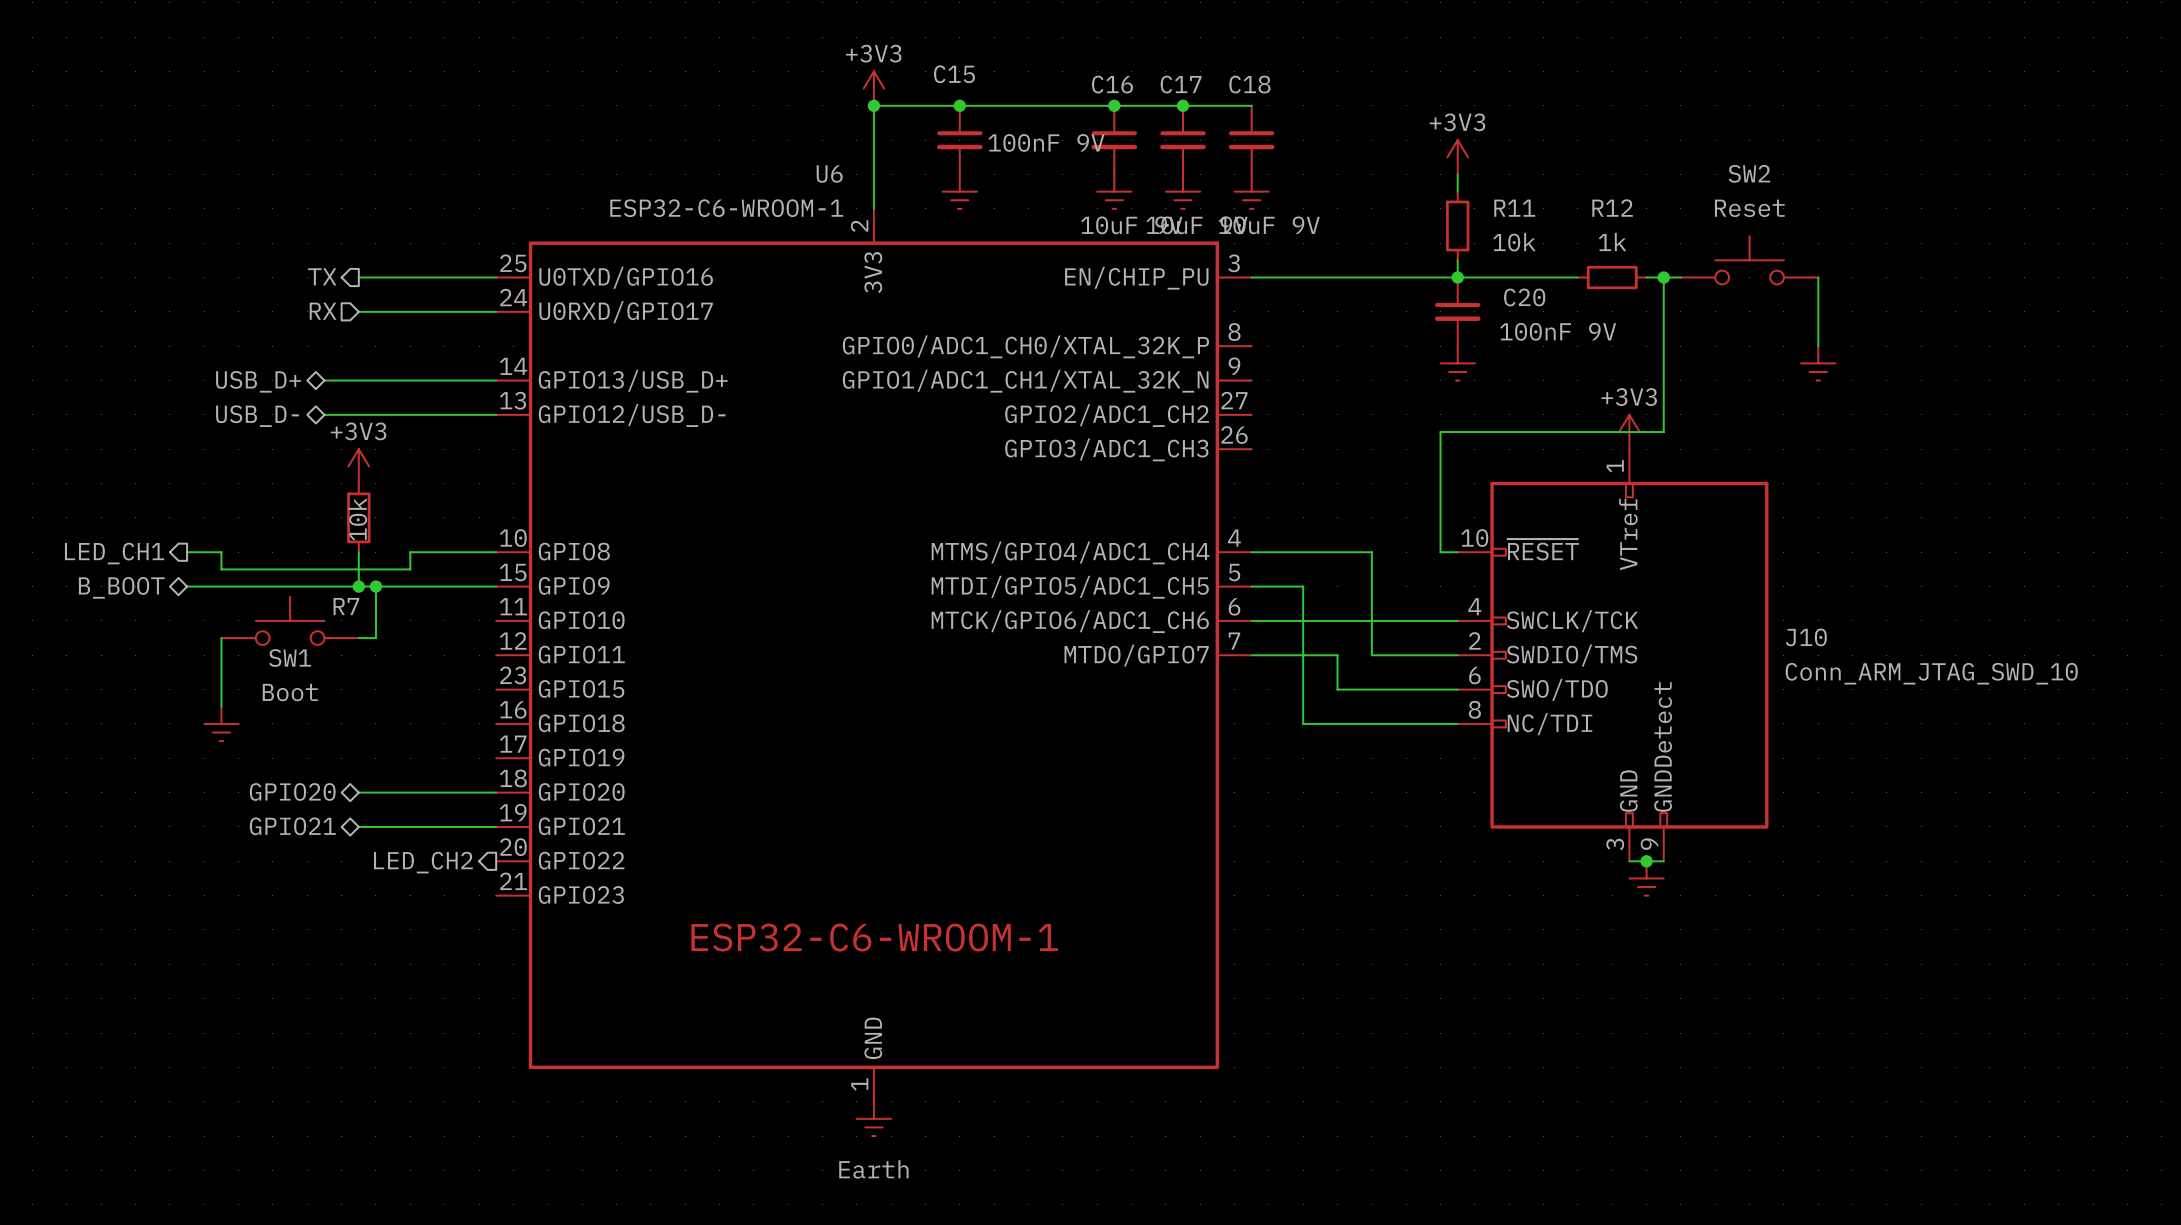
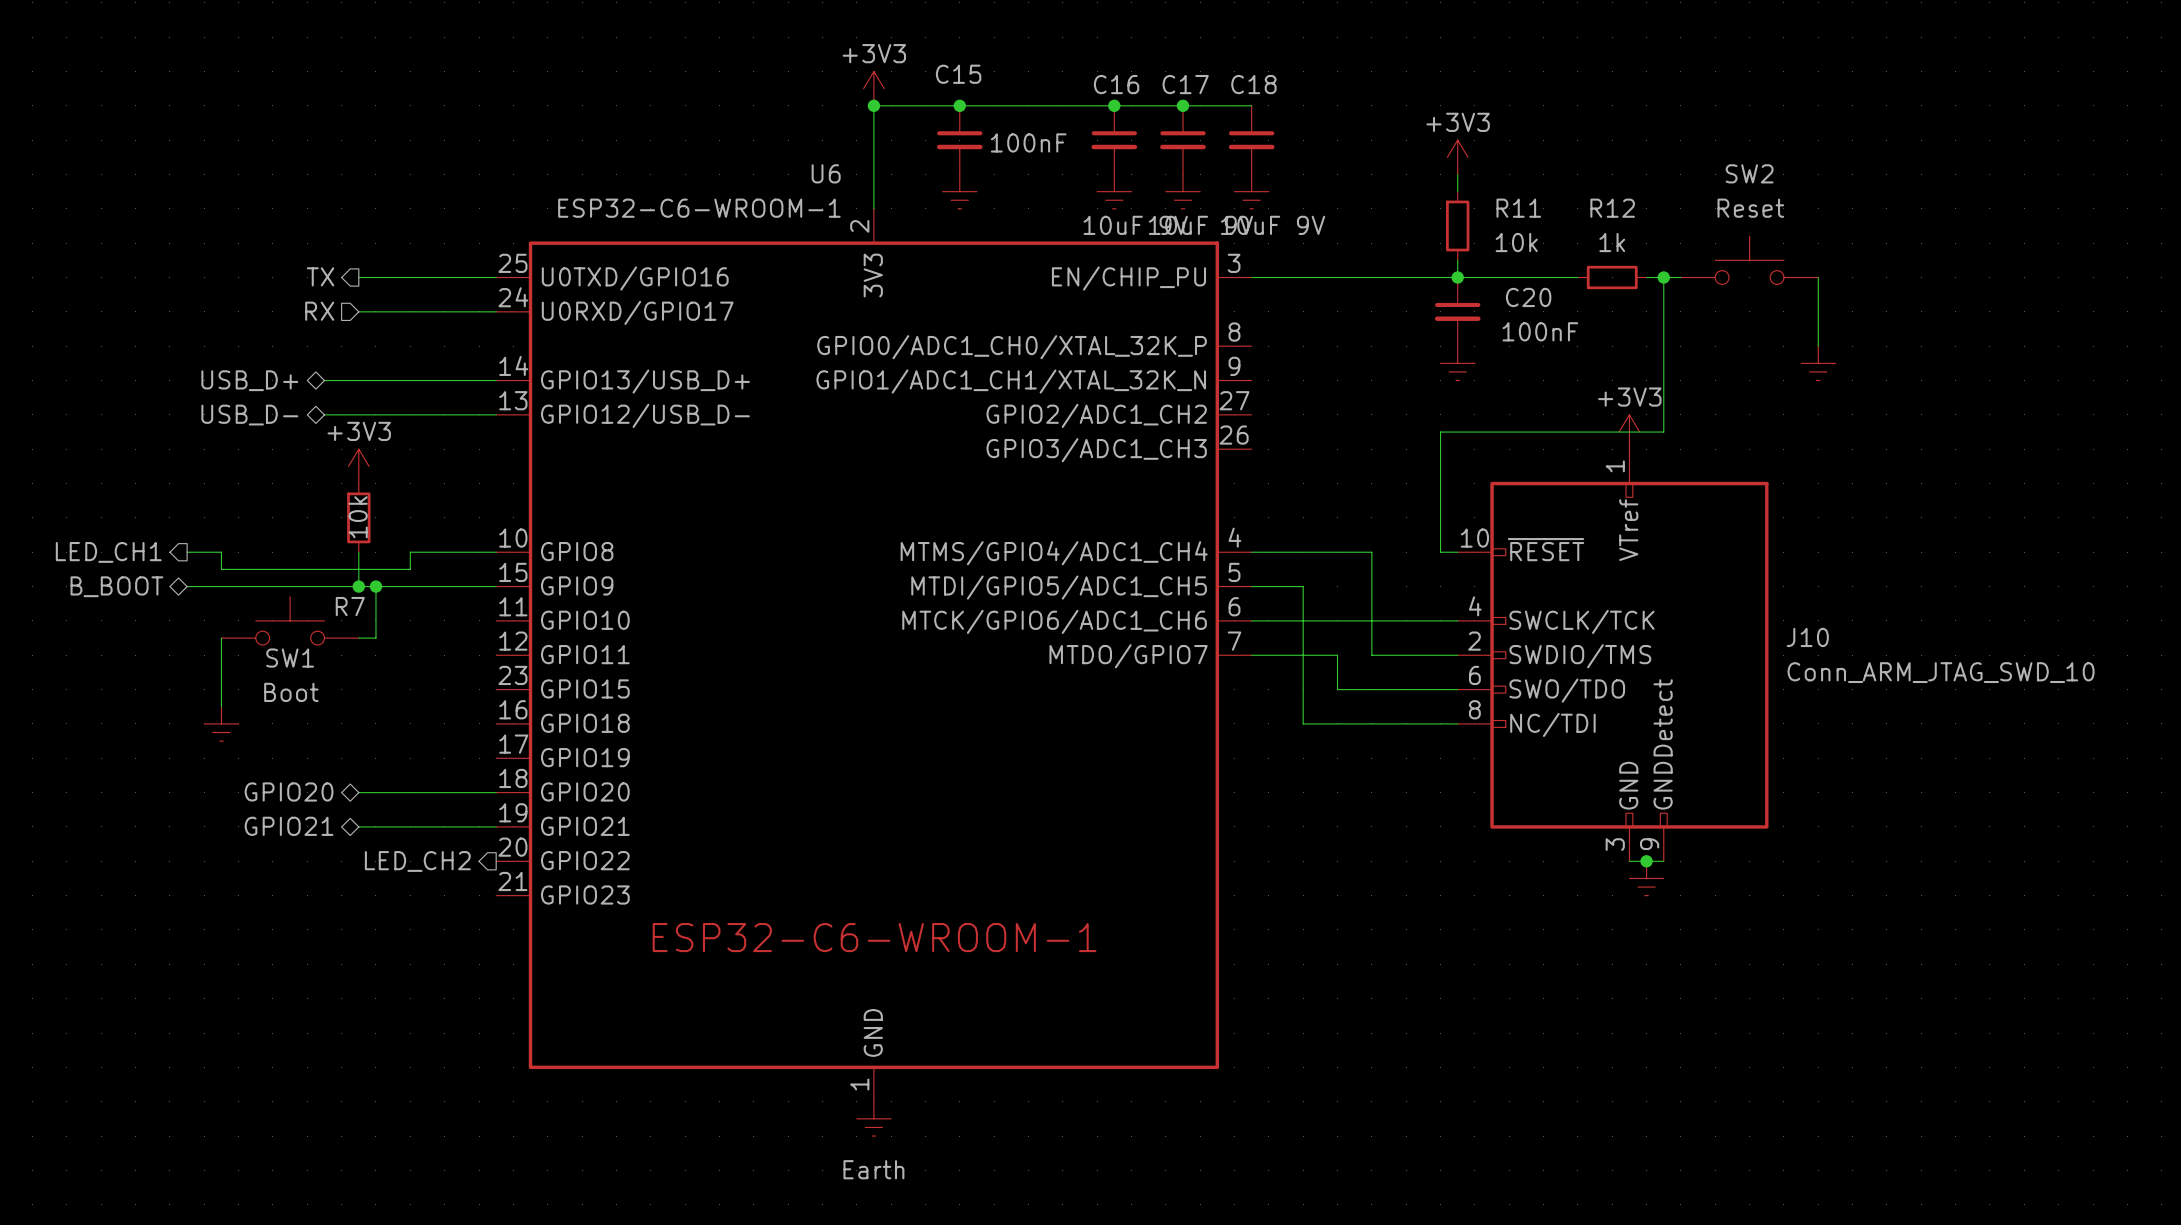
C15 value: 100nF 9V (1046, 142) -> 100nF (1028, 142)
C20 value: 100nF 9V (1558, 331) -> 100nF (1540, 331)

